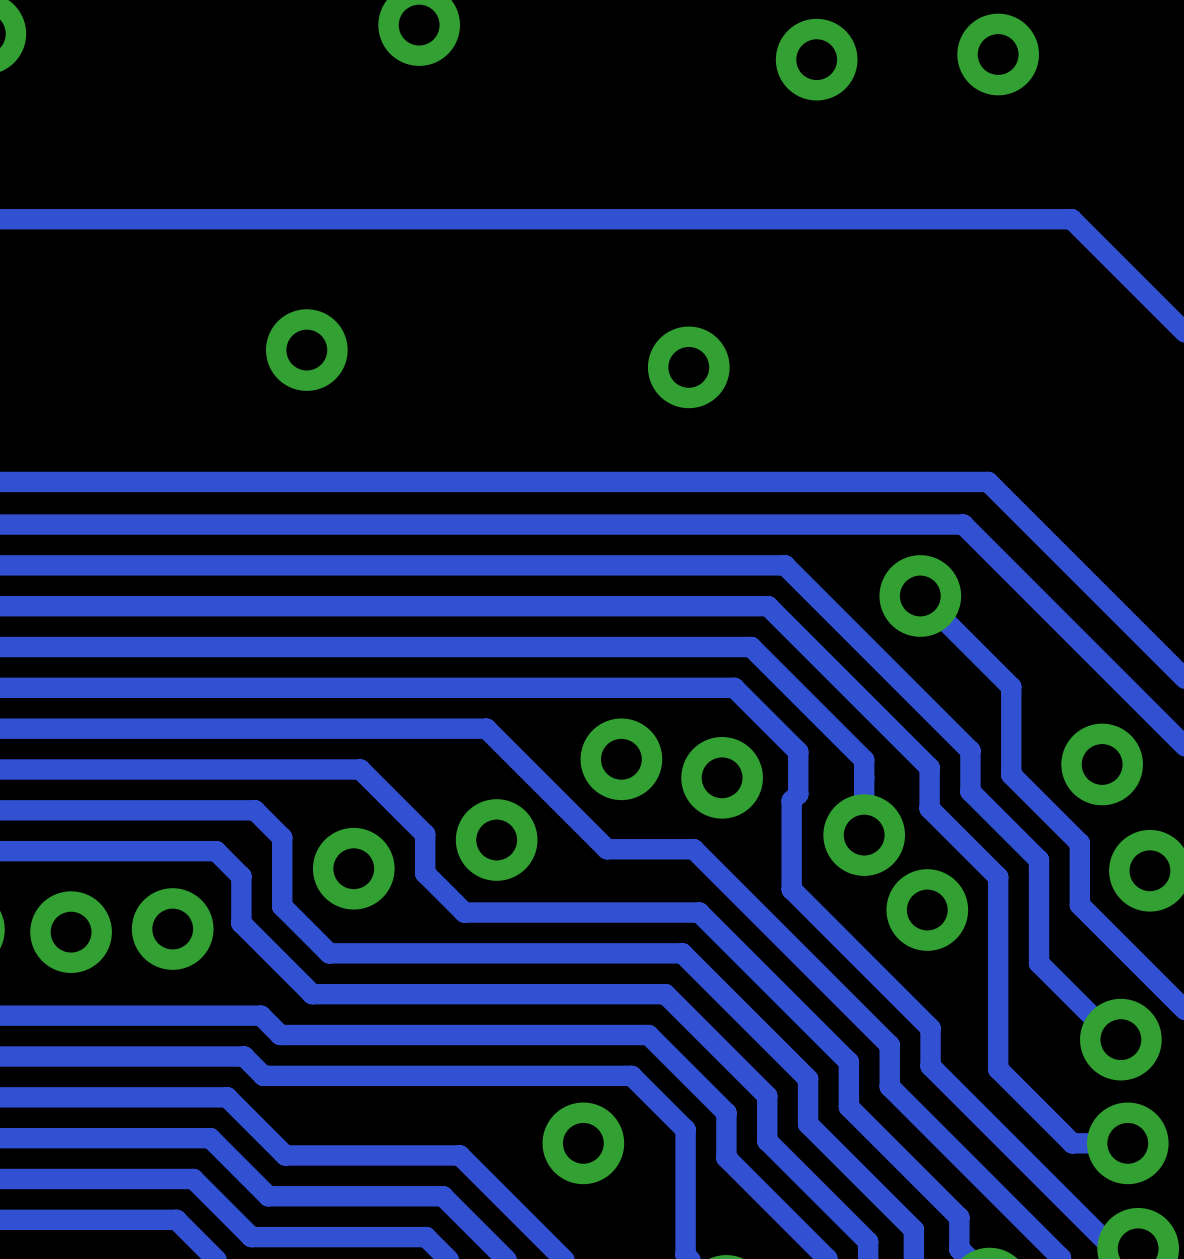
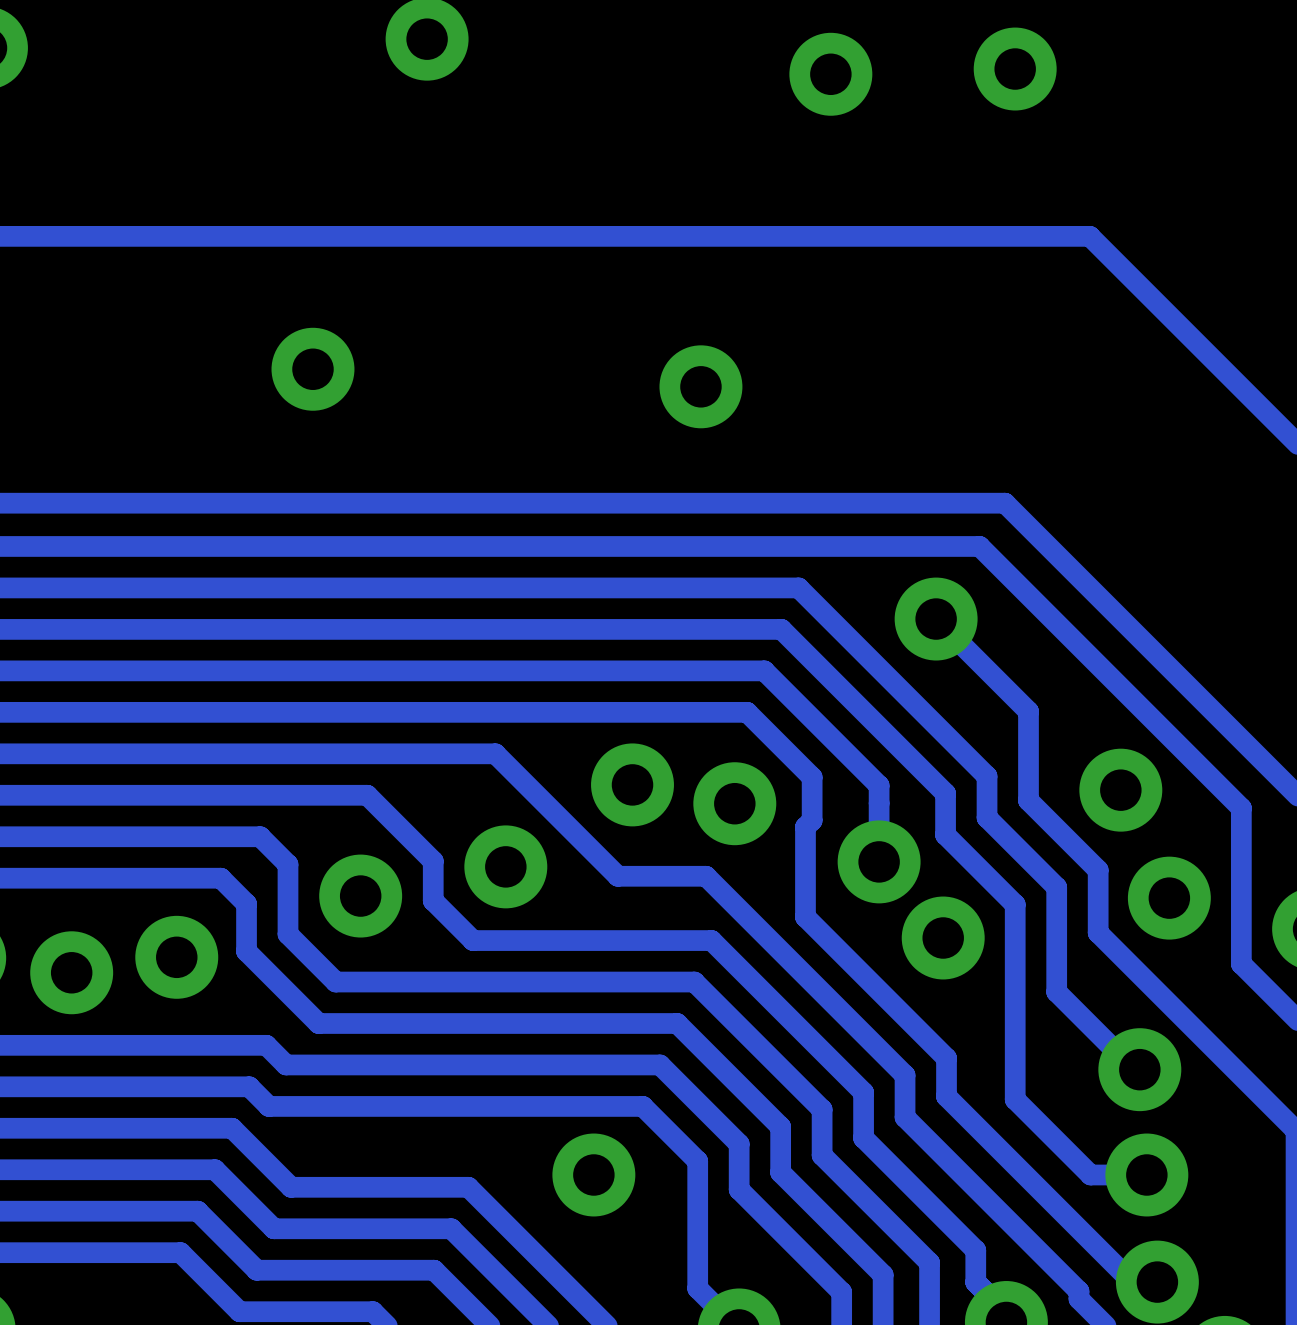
via position: (71, 932) -> (71, 972)

